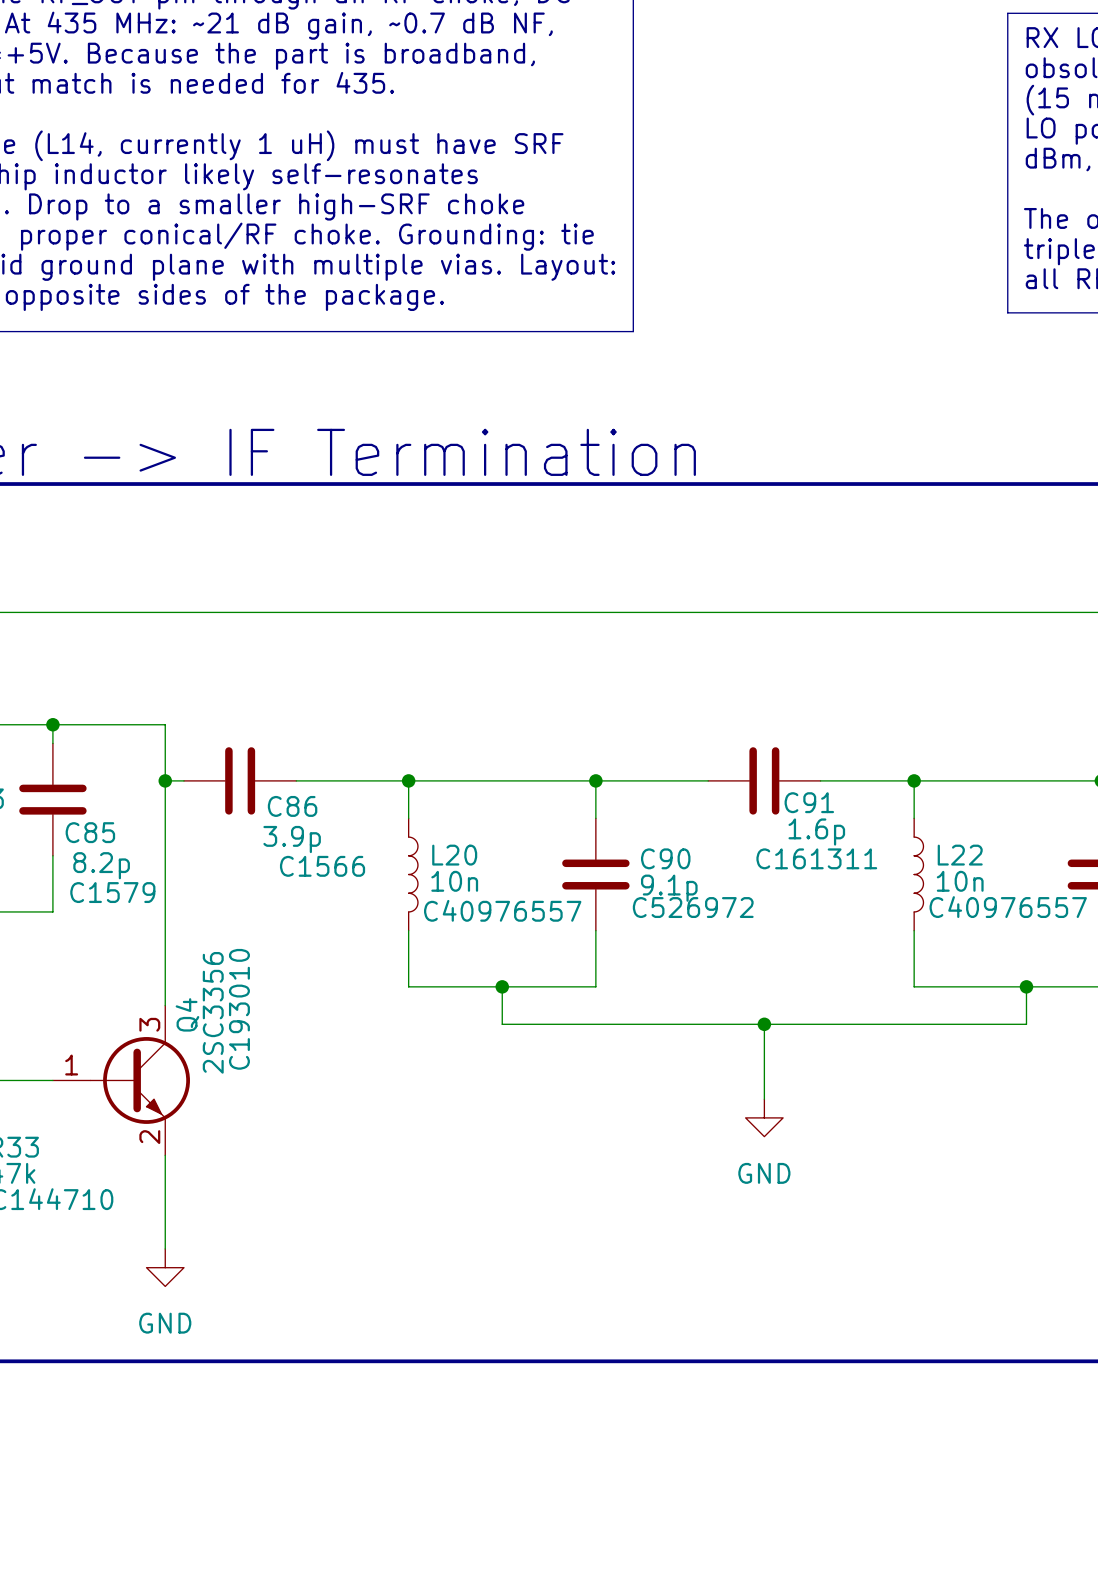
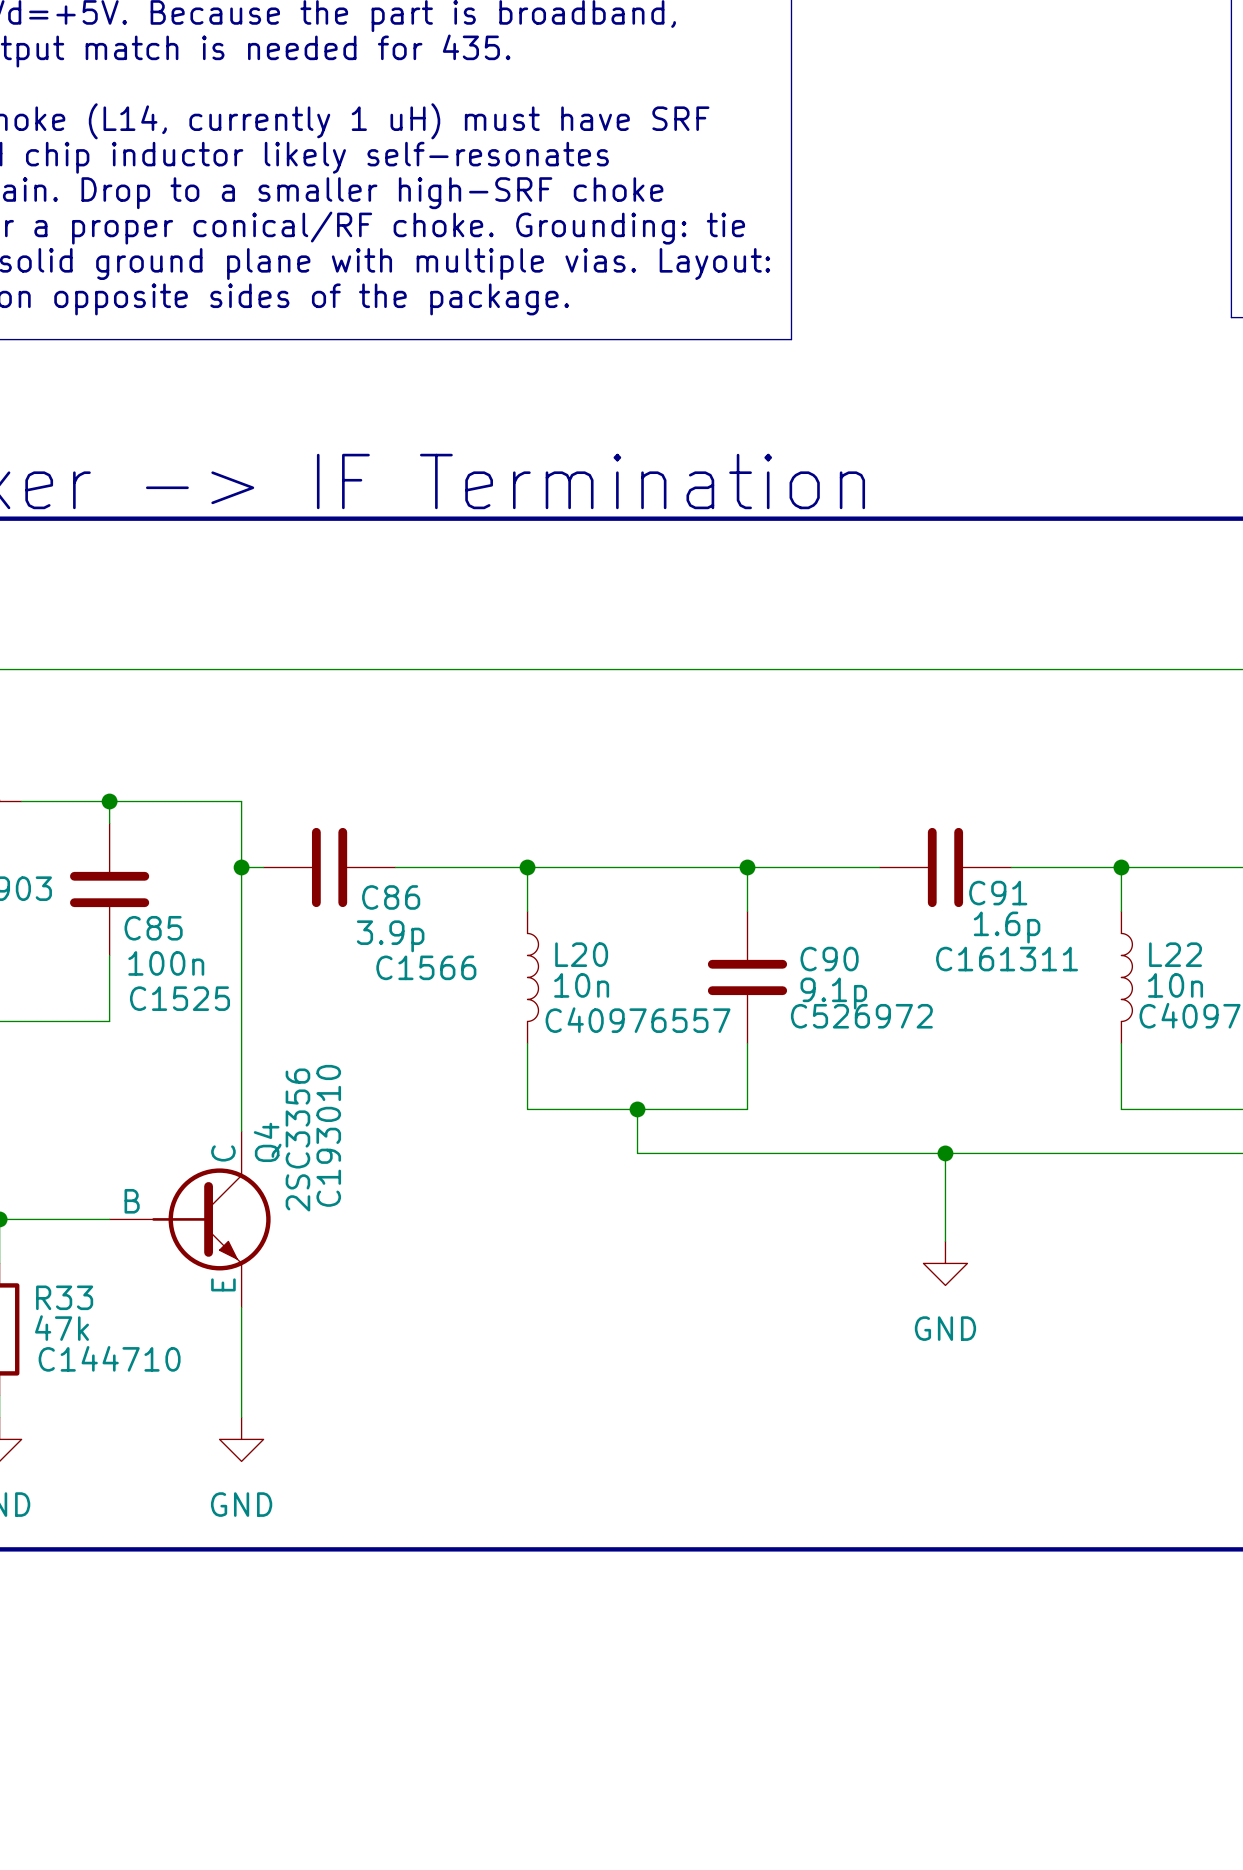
C85 value: 8.2p (101, 865) -> 100n (166, 963)
C85 text: C1579 (112, 892) -> C1525 (179, 998)
Q4 symbol: [52, 1005, 190, 1156] -> [109, 1131, 271, 1308]

